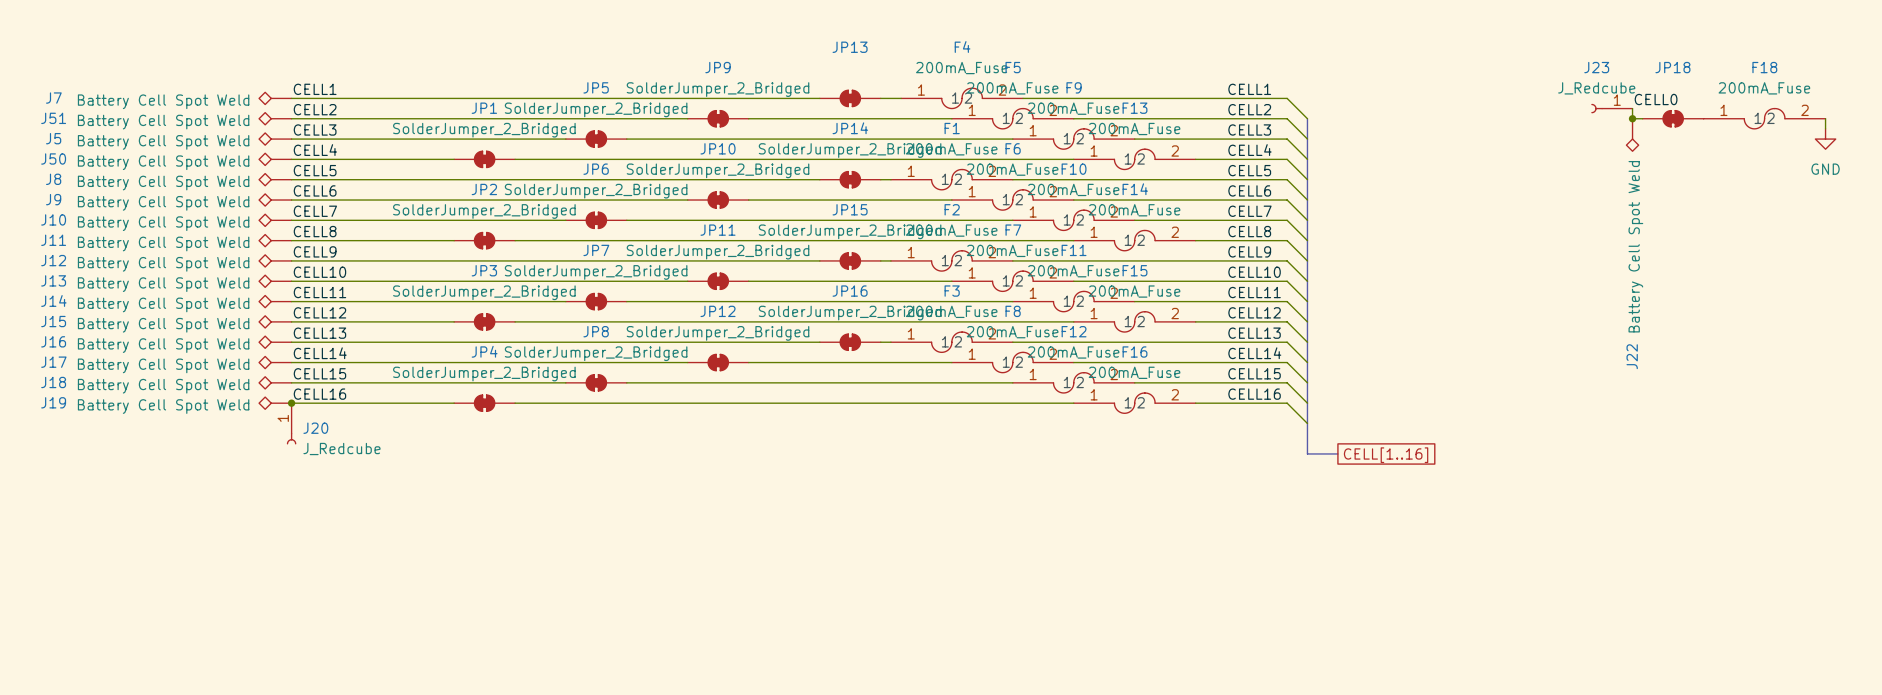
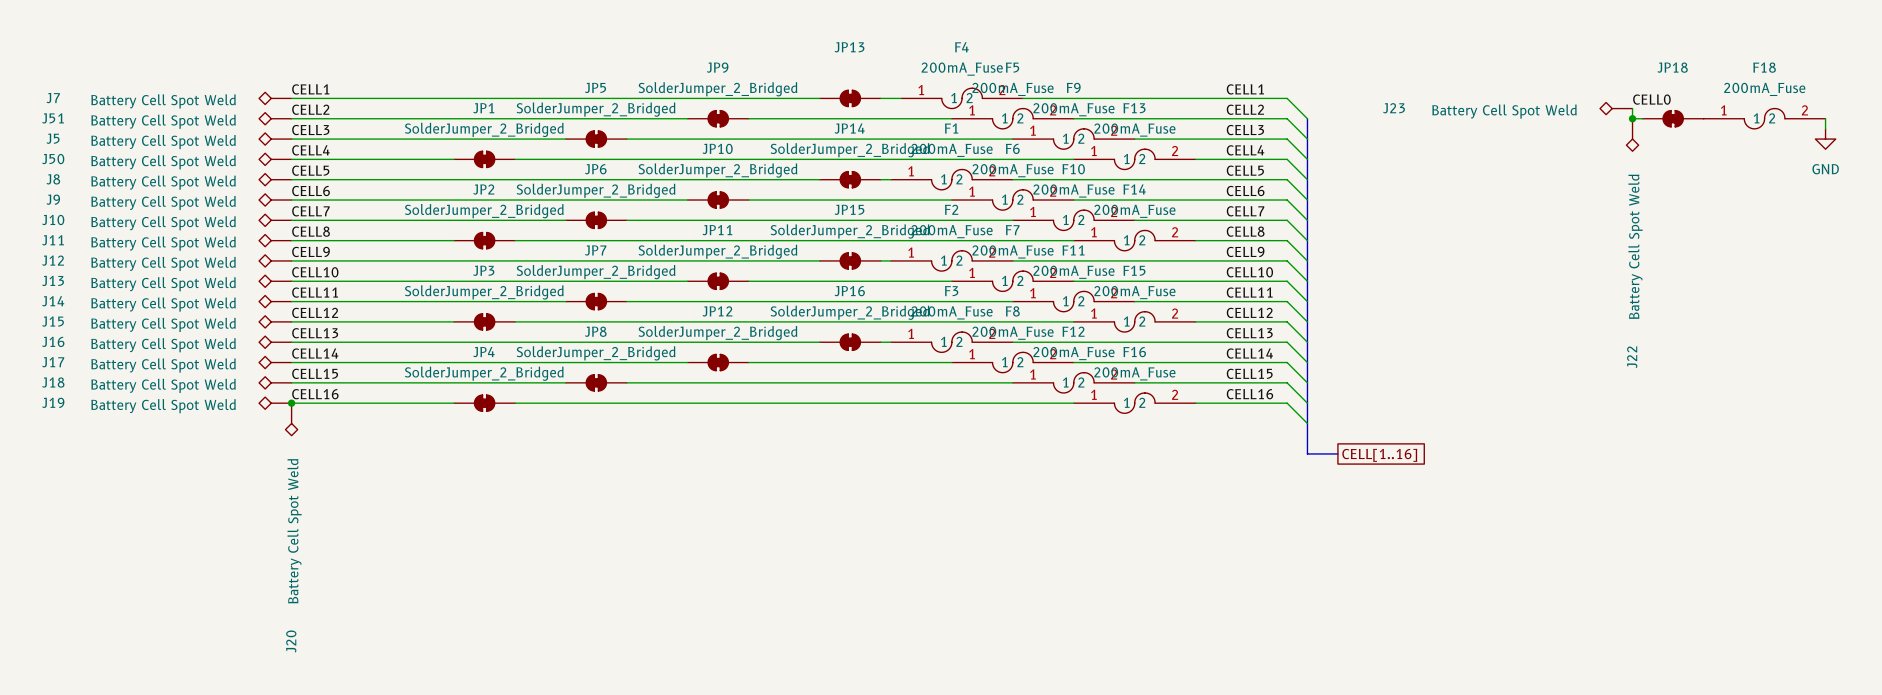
J23 name position: J23 (1596, 67) -> J23 (1394, 108)
J23 value: J_Redcube (1596, 88) -> Battery Cell Spot Weld (1504, 111)
J23 symbol: [1591, 103, 1633, 114] -> [1600, 102, 1633, 115]
J20 symbol: [286, 403, 297, 445] -> [285, 403, 298, 436]
J20 name position: J20 (315, 428) -> J20 (291, 641)
J20 value: J_Redcube (341, 449) -> Battery Cell Spot Weld (294, 531)

